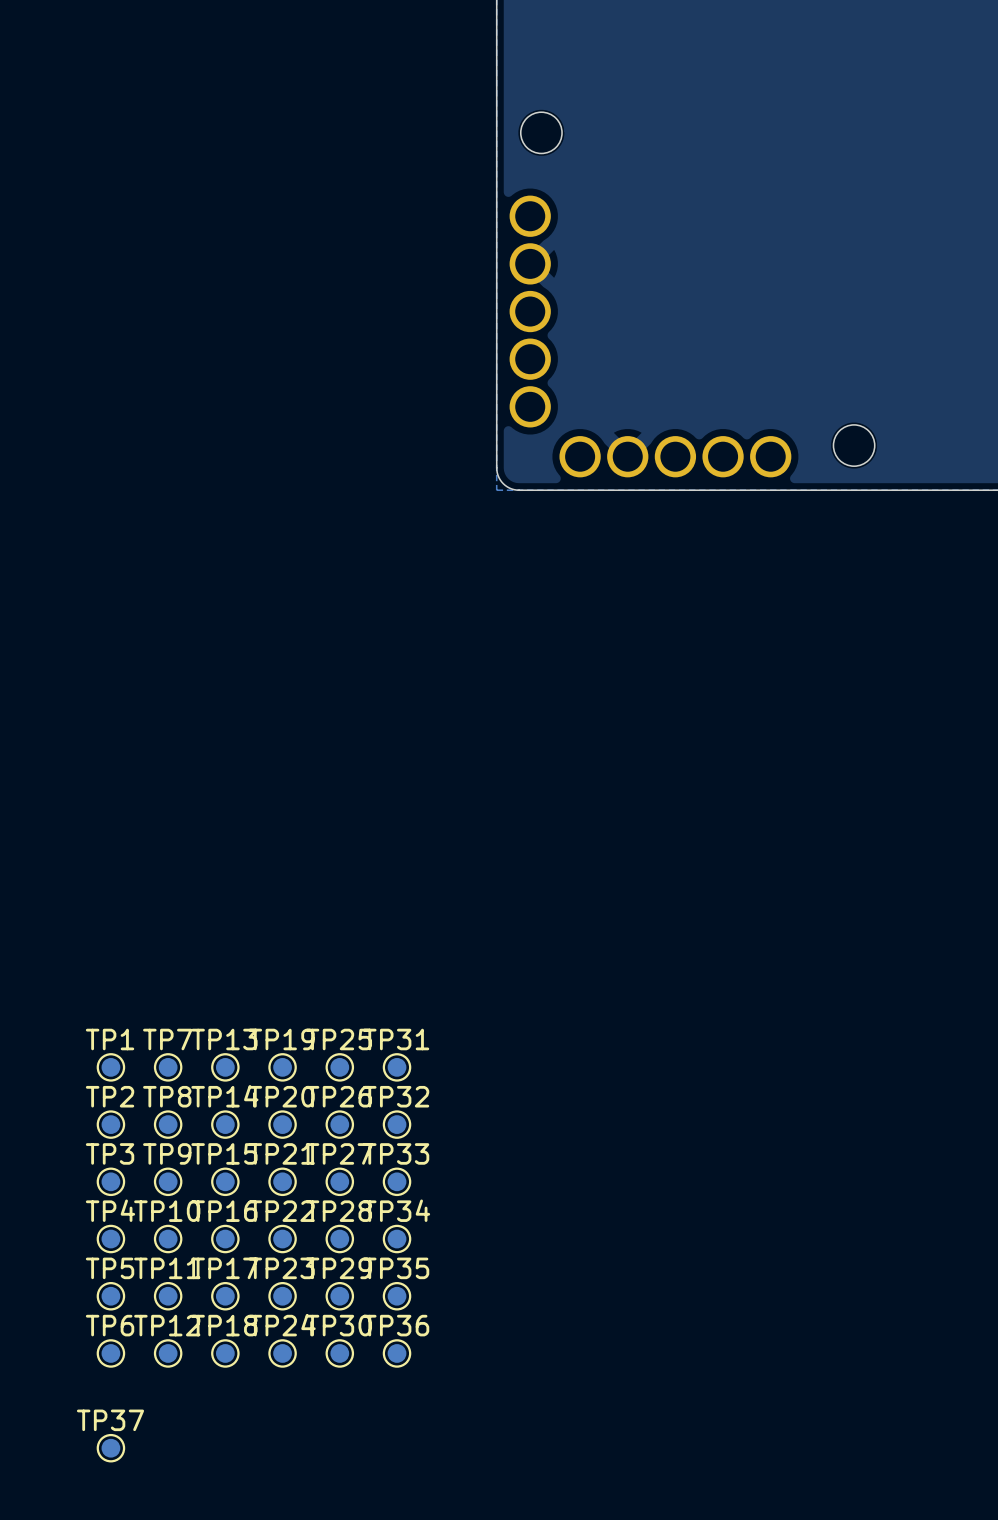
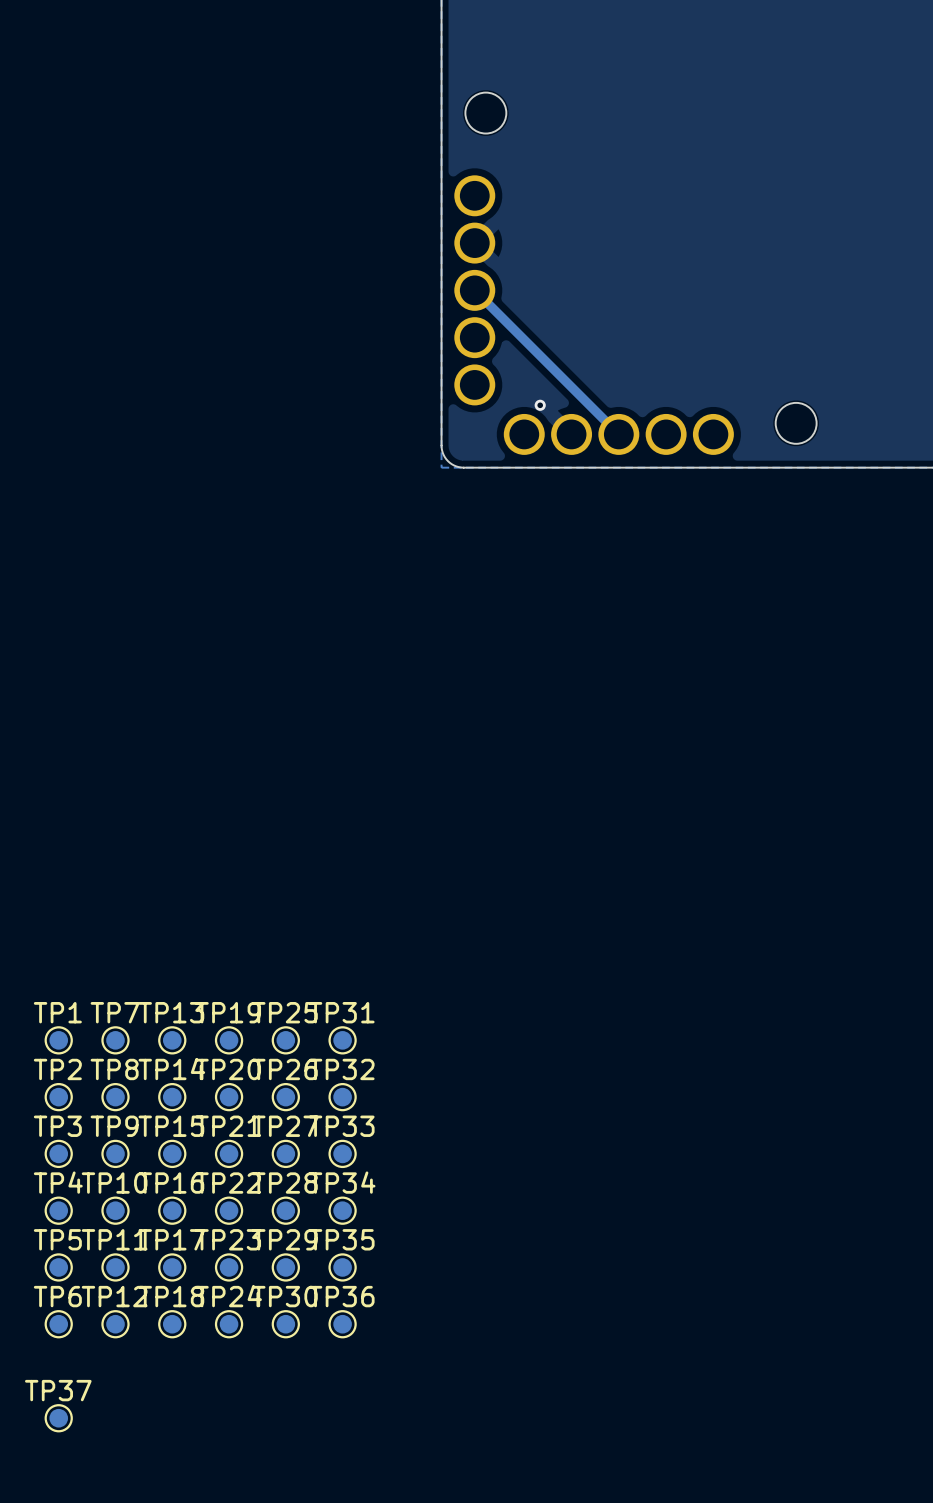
track: none -> (474, 290) (618, 434)
via: none -> (540, 405)

